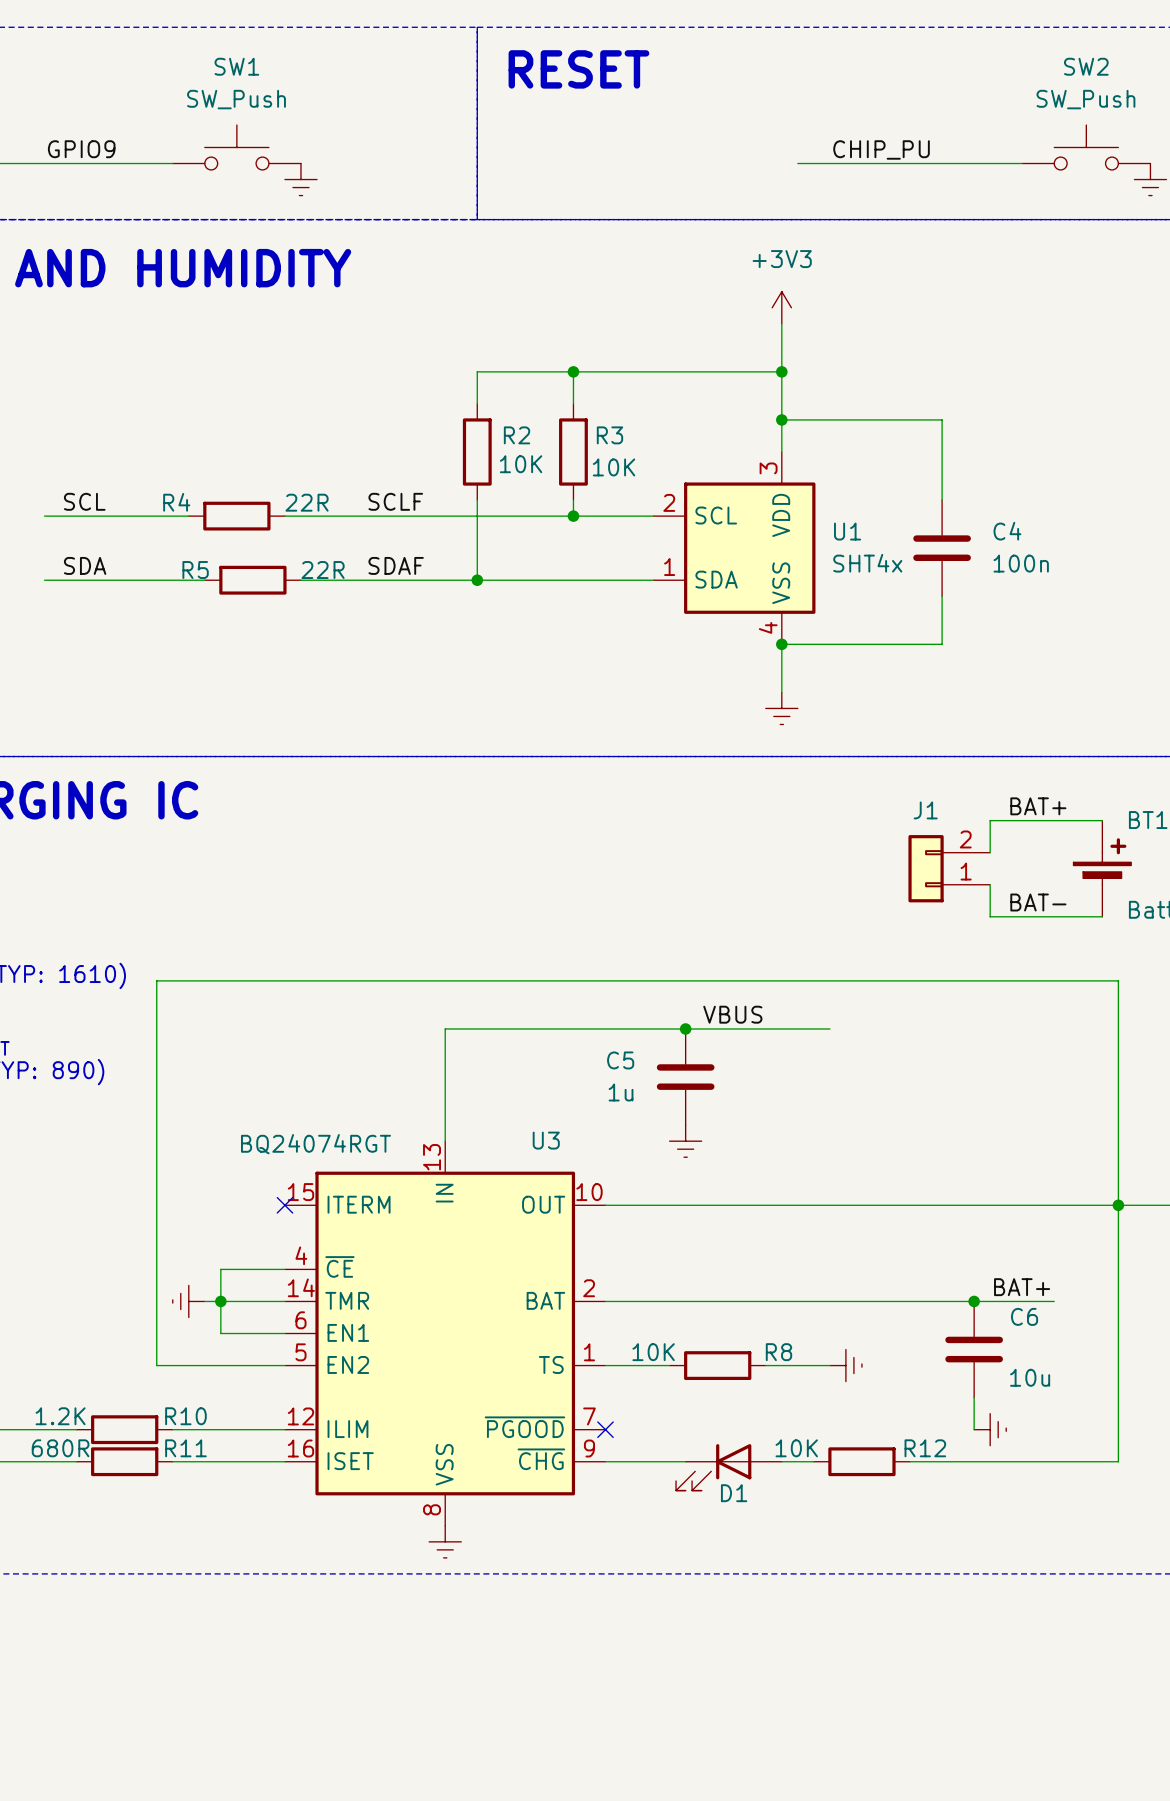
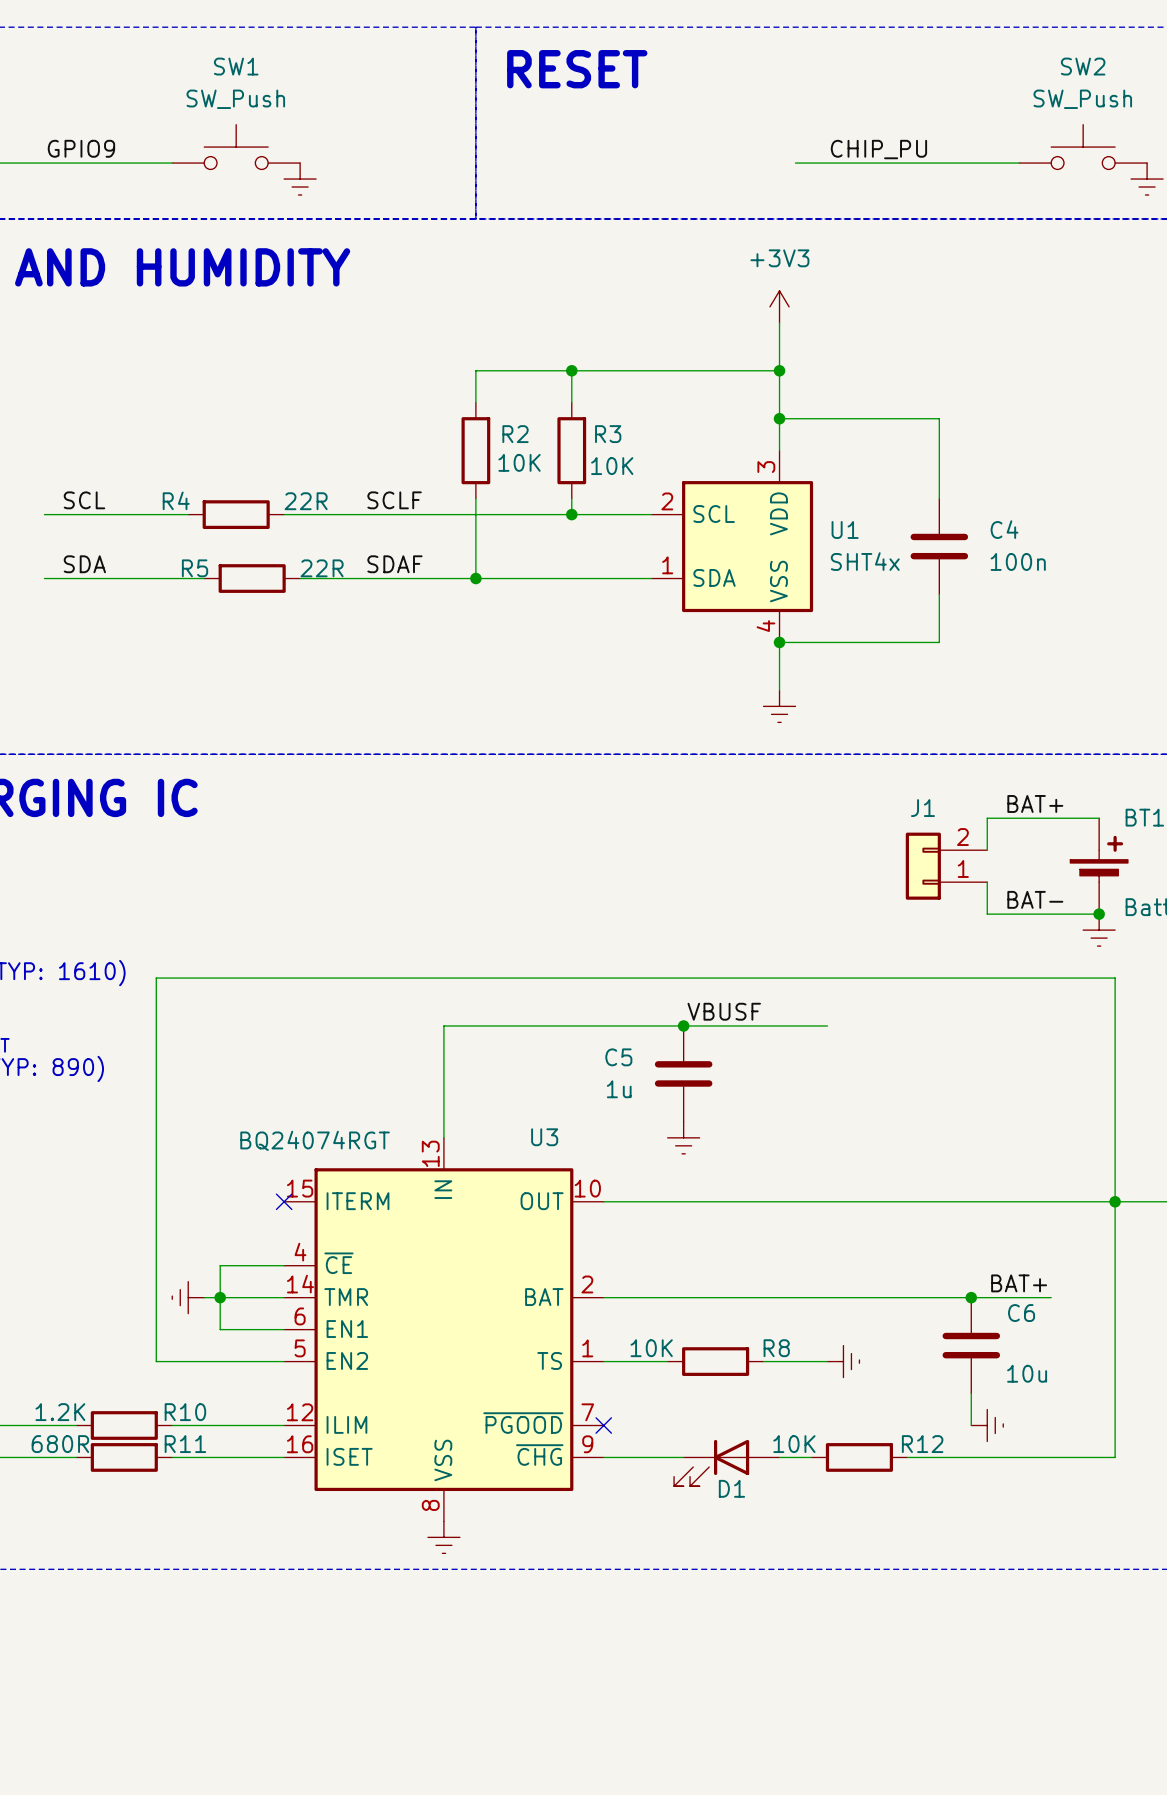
junction: none -> (1099, 914)
power symbol: none -> (1099, 930)
label: VBUS (732, 1014) -> VBUSF (724, 1011)

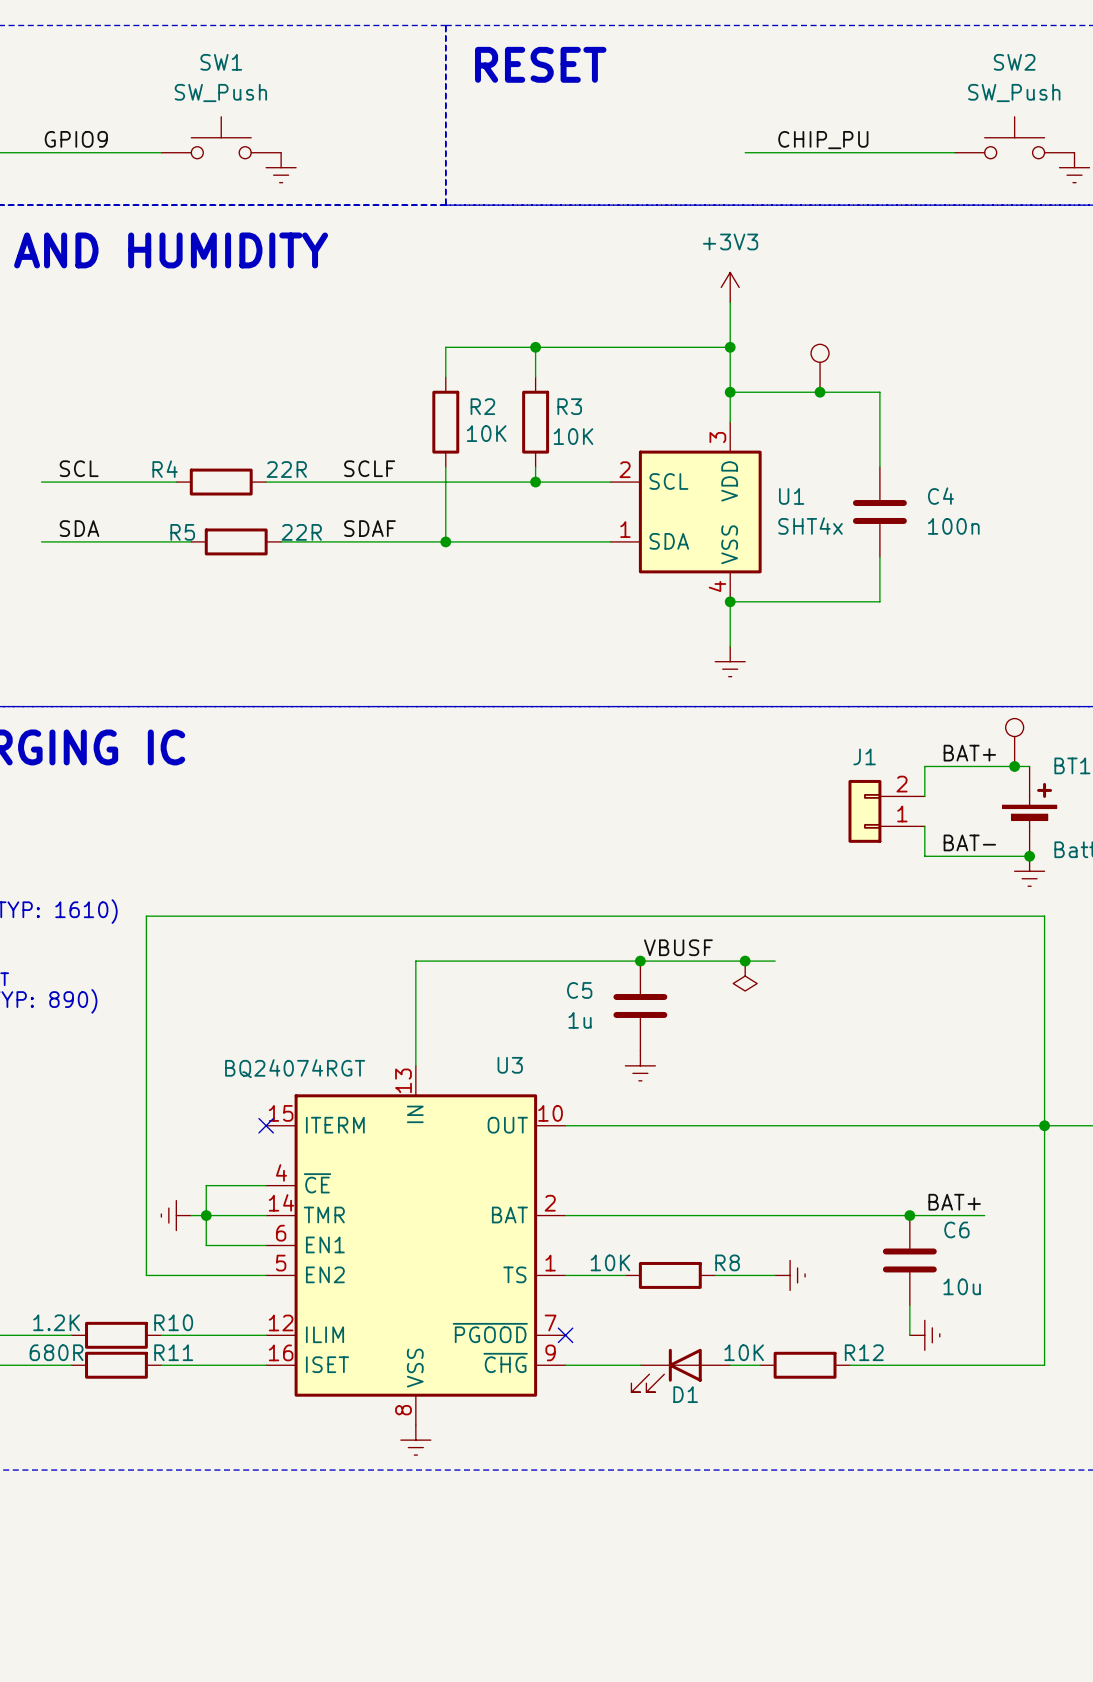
part: none -> (820, 368)
junction: none -> (820, 392)
part: none -> (1014, 742)
junction: none -> (1014, 766)
junction: none -> (745, 961)
power symbol: none -> (745, 976)

